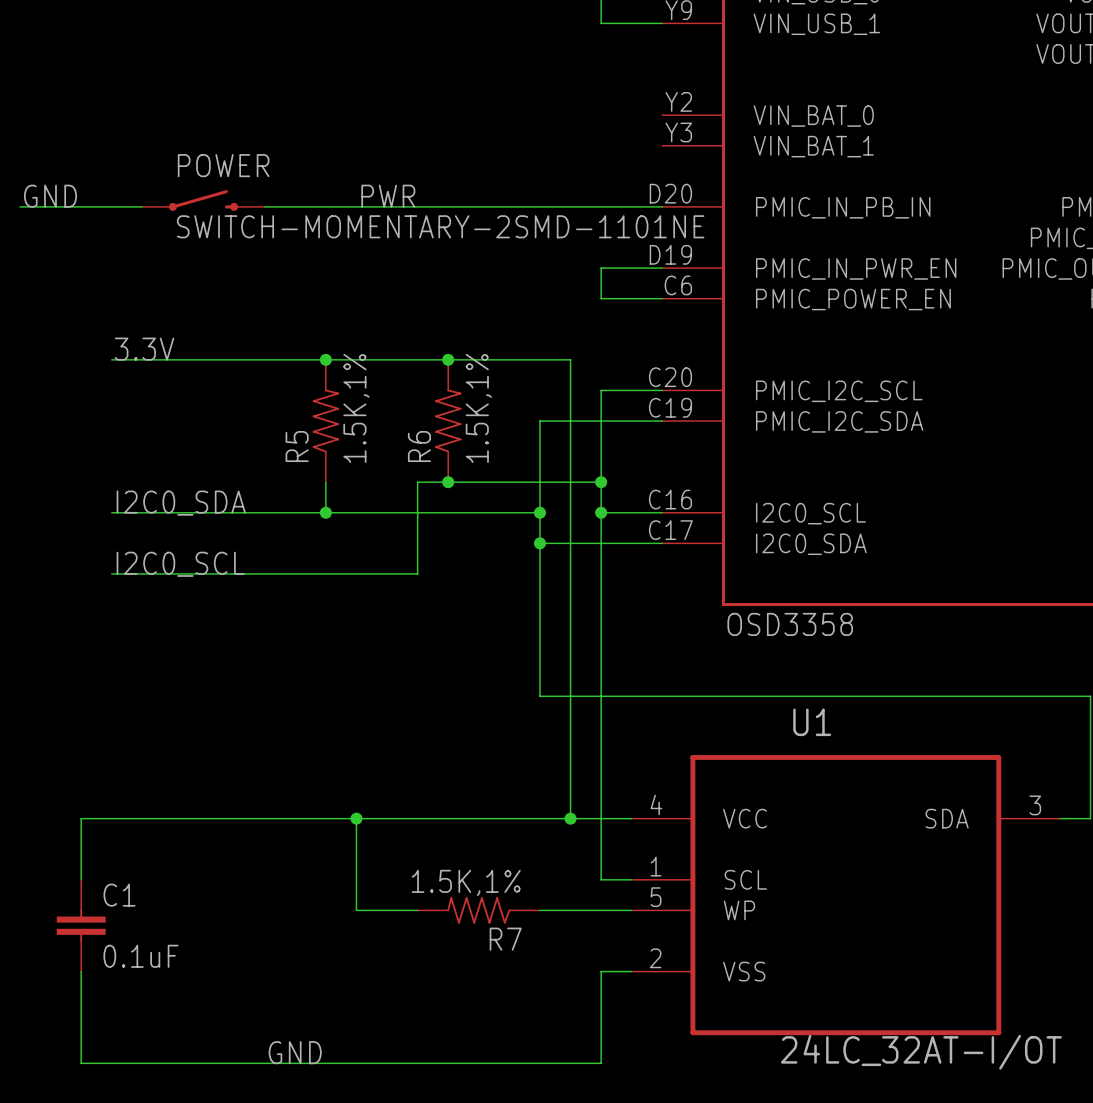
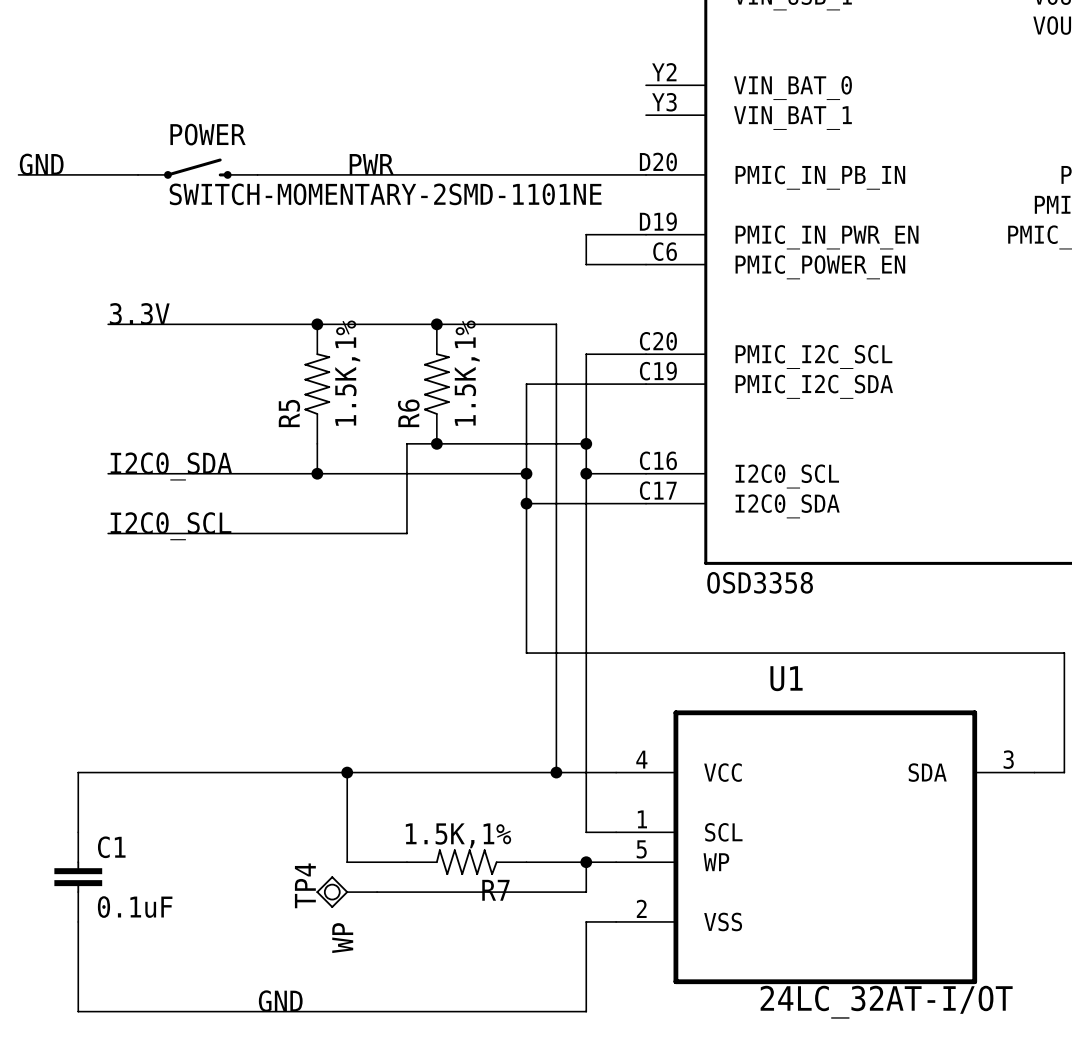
wire: none -> (586, 862) (586, 892) (377, 892)
junction: none -> (586, 862)
TP4: none -> (346, 892)

